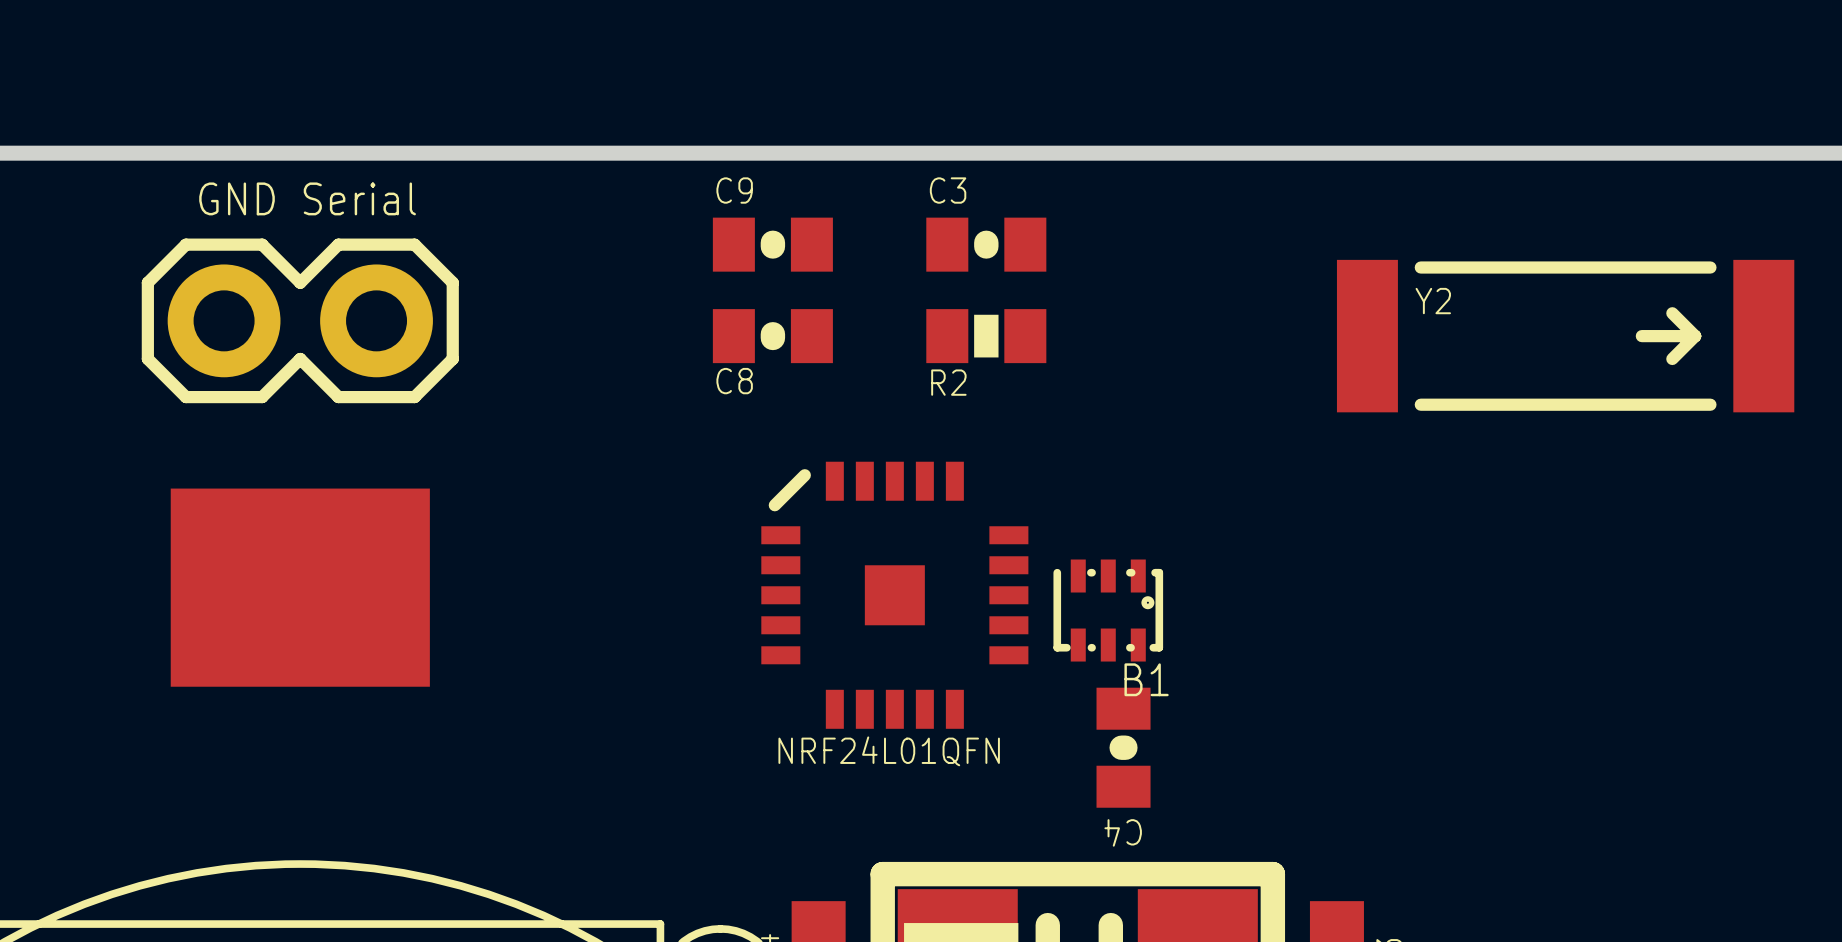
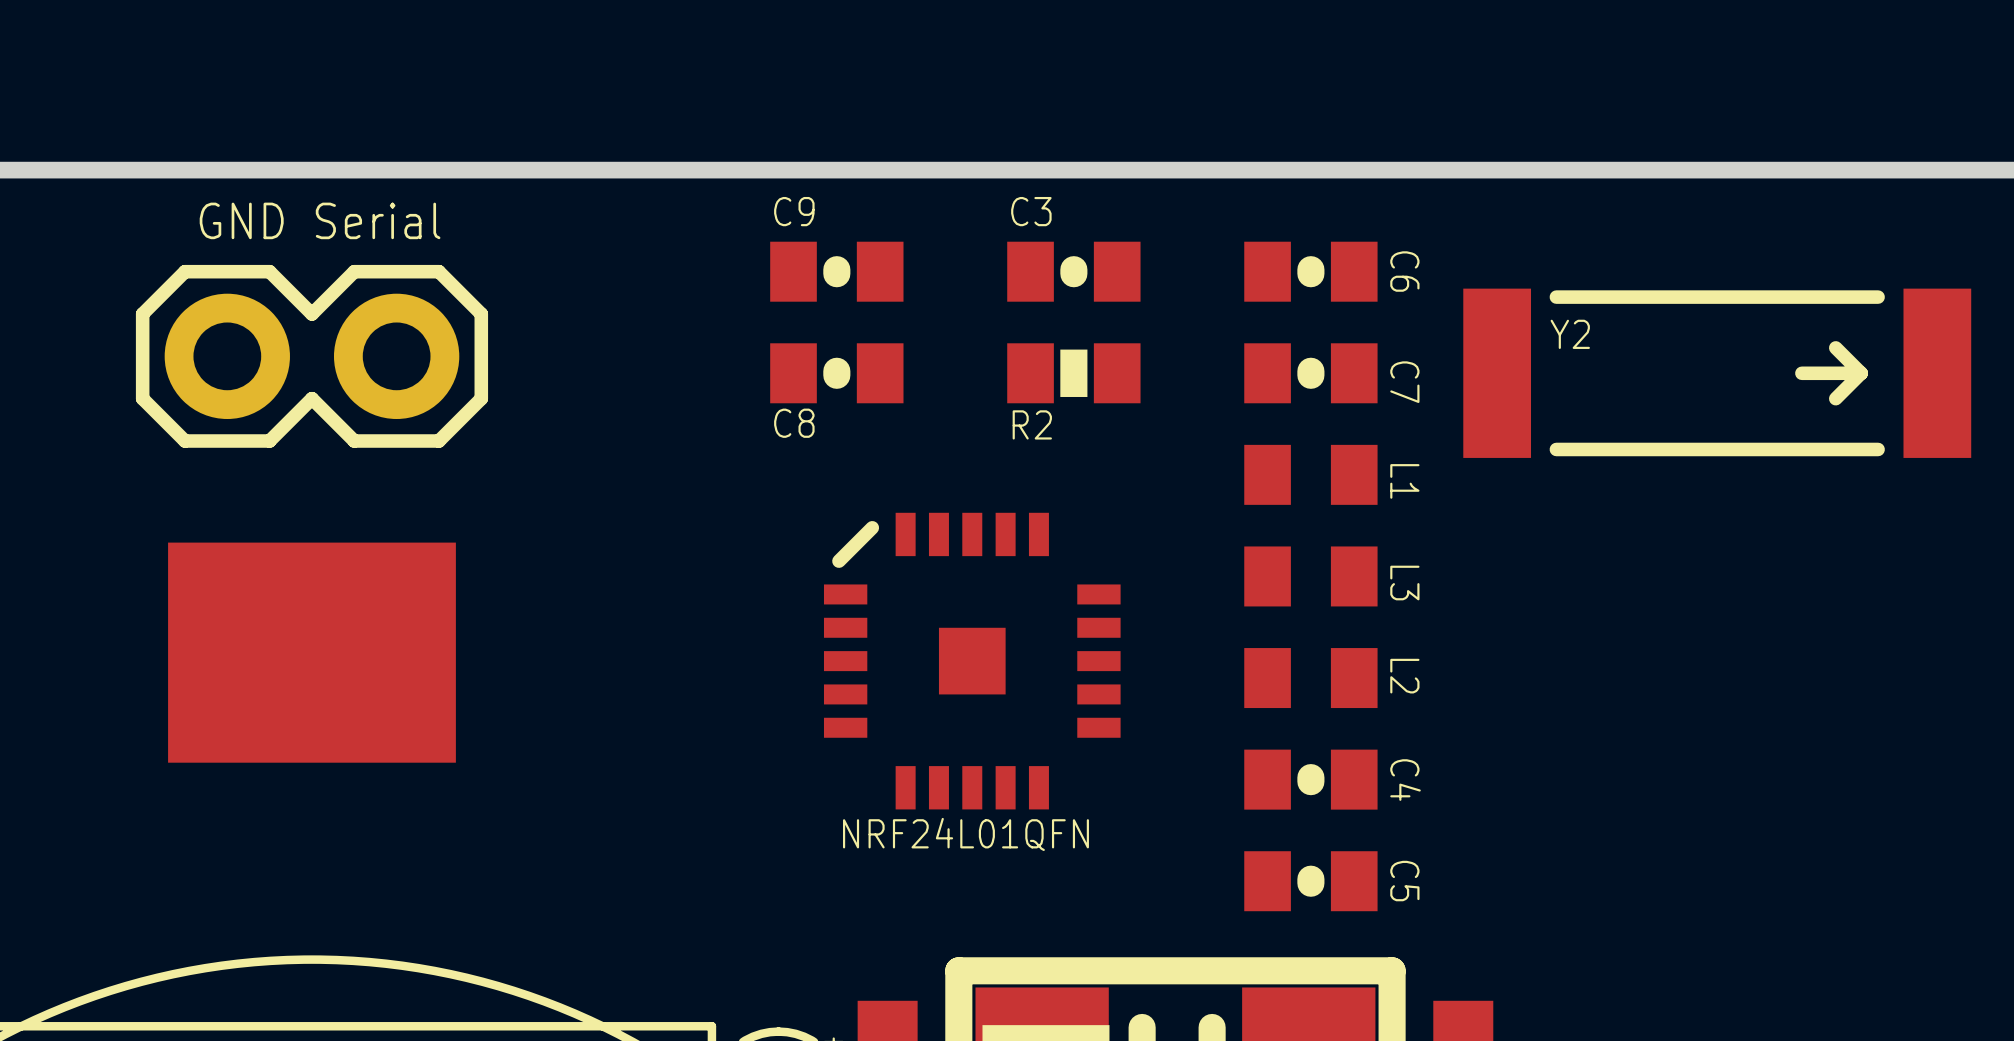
C6: none -> (1310, 271)
C7: none -> (1310, 373)
L1: none -> (1310, 474)
L3: none -> (1310, 576)
B1: (1108, 610) -> none
L2: none -> (1310, 678)
C4 rotation: 0° (1123, 747) -> 90° clockwise (1310, 779)
C4 position: (1123, 747) -> (1310, 779)
C5: none -> (1310, 881)

